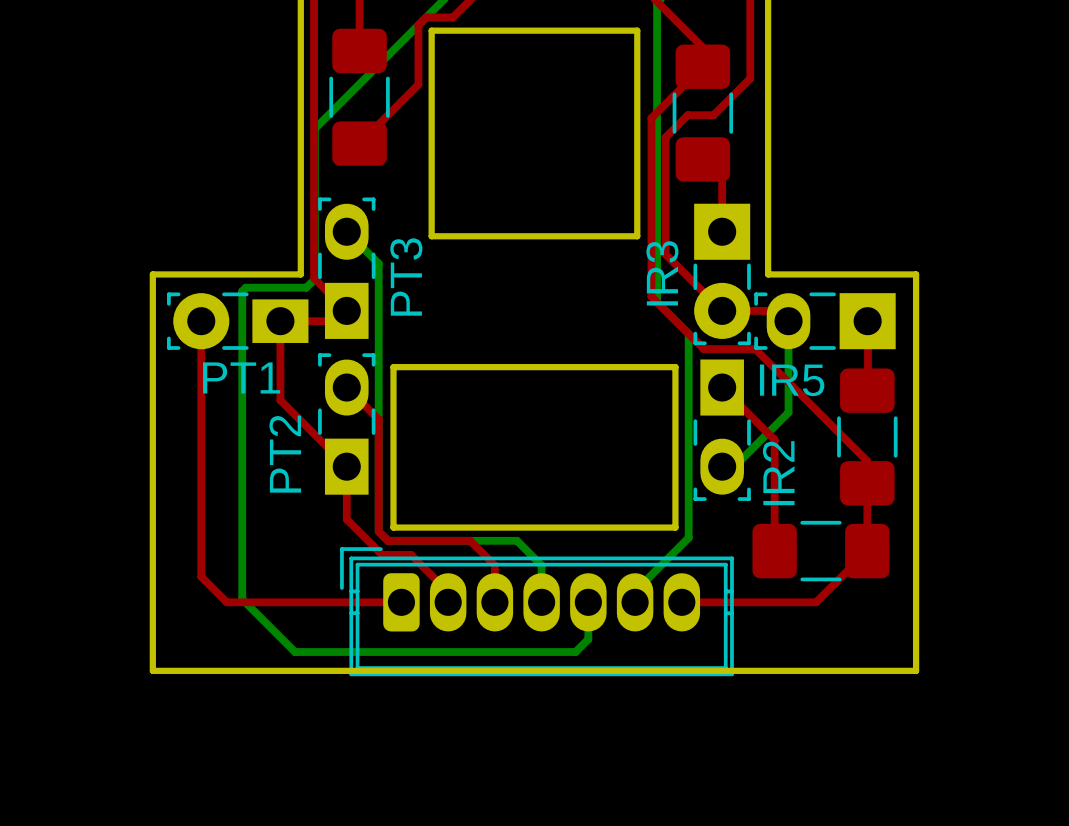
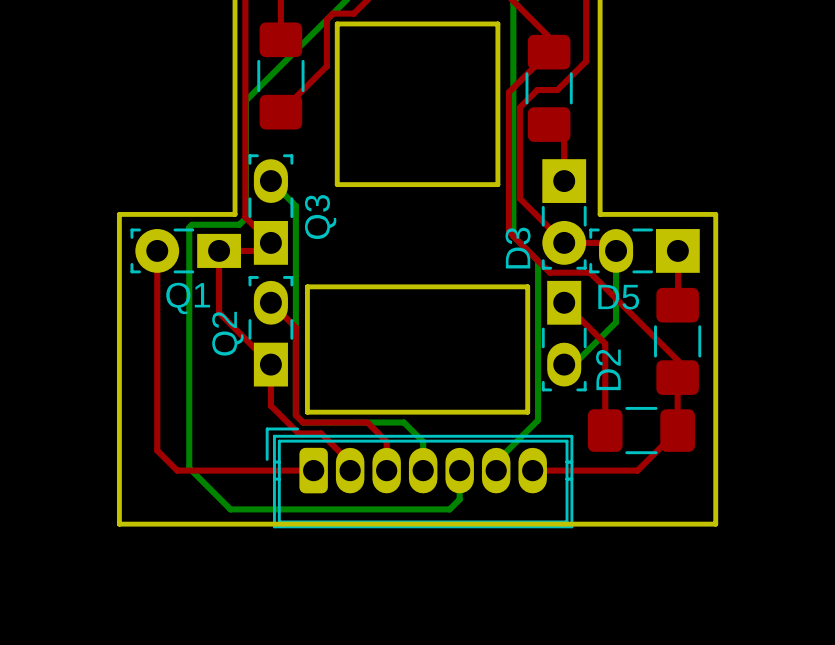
IR3 name: IR3 (662, 273) -> D3 (518, 248)
PT3 name: PT3 (406, 277) -> Q3 (320, 217)
PT1 name: PT1 (241, 377) -> Q1 (188, 298)
IR5 name: IR5 (792, 380) -> D5 (618, 297)
PT2 name: PT2 (285, 454) -> Q2 (227, 333)
IR2 name: IR2 (778, 473) -> D2 (608, 369)

